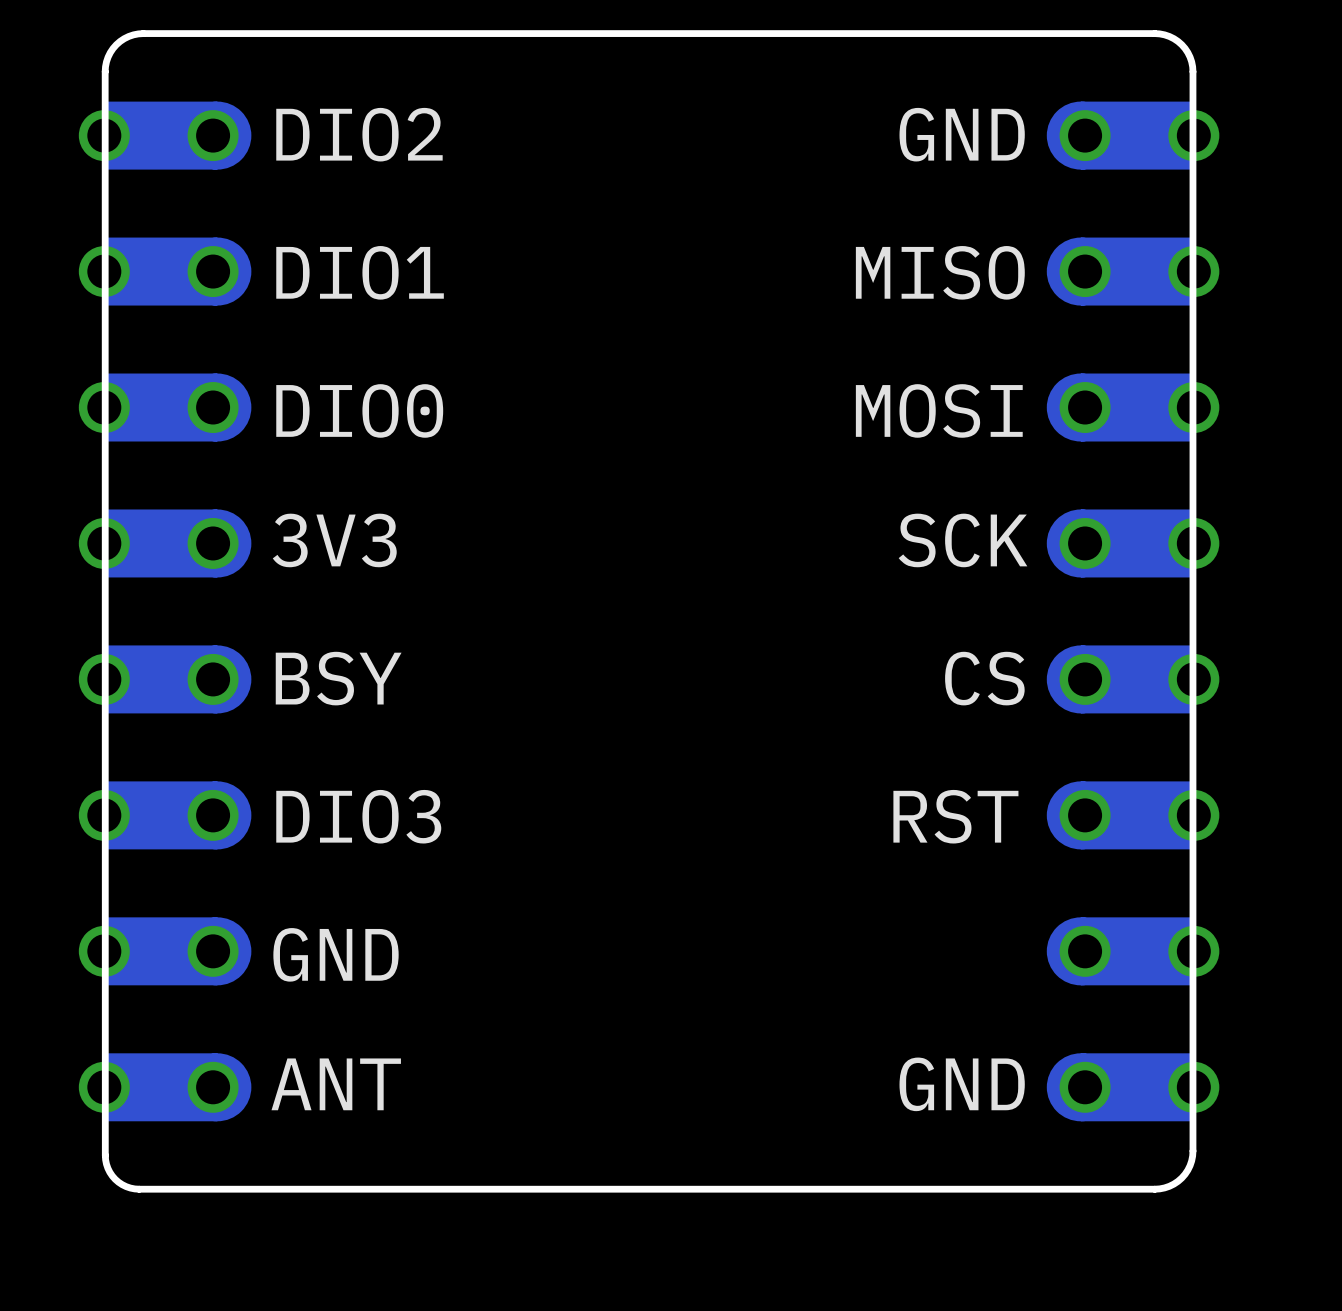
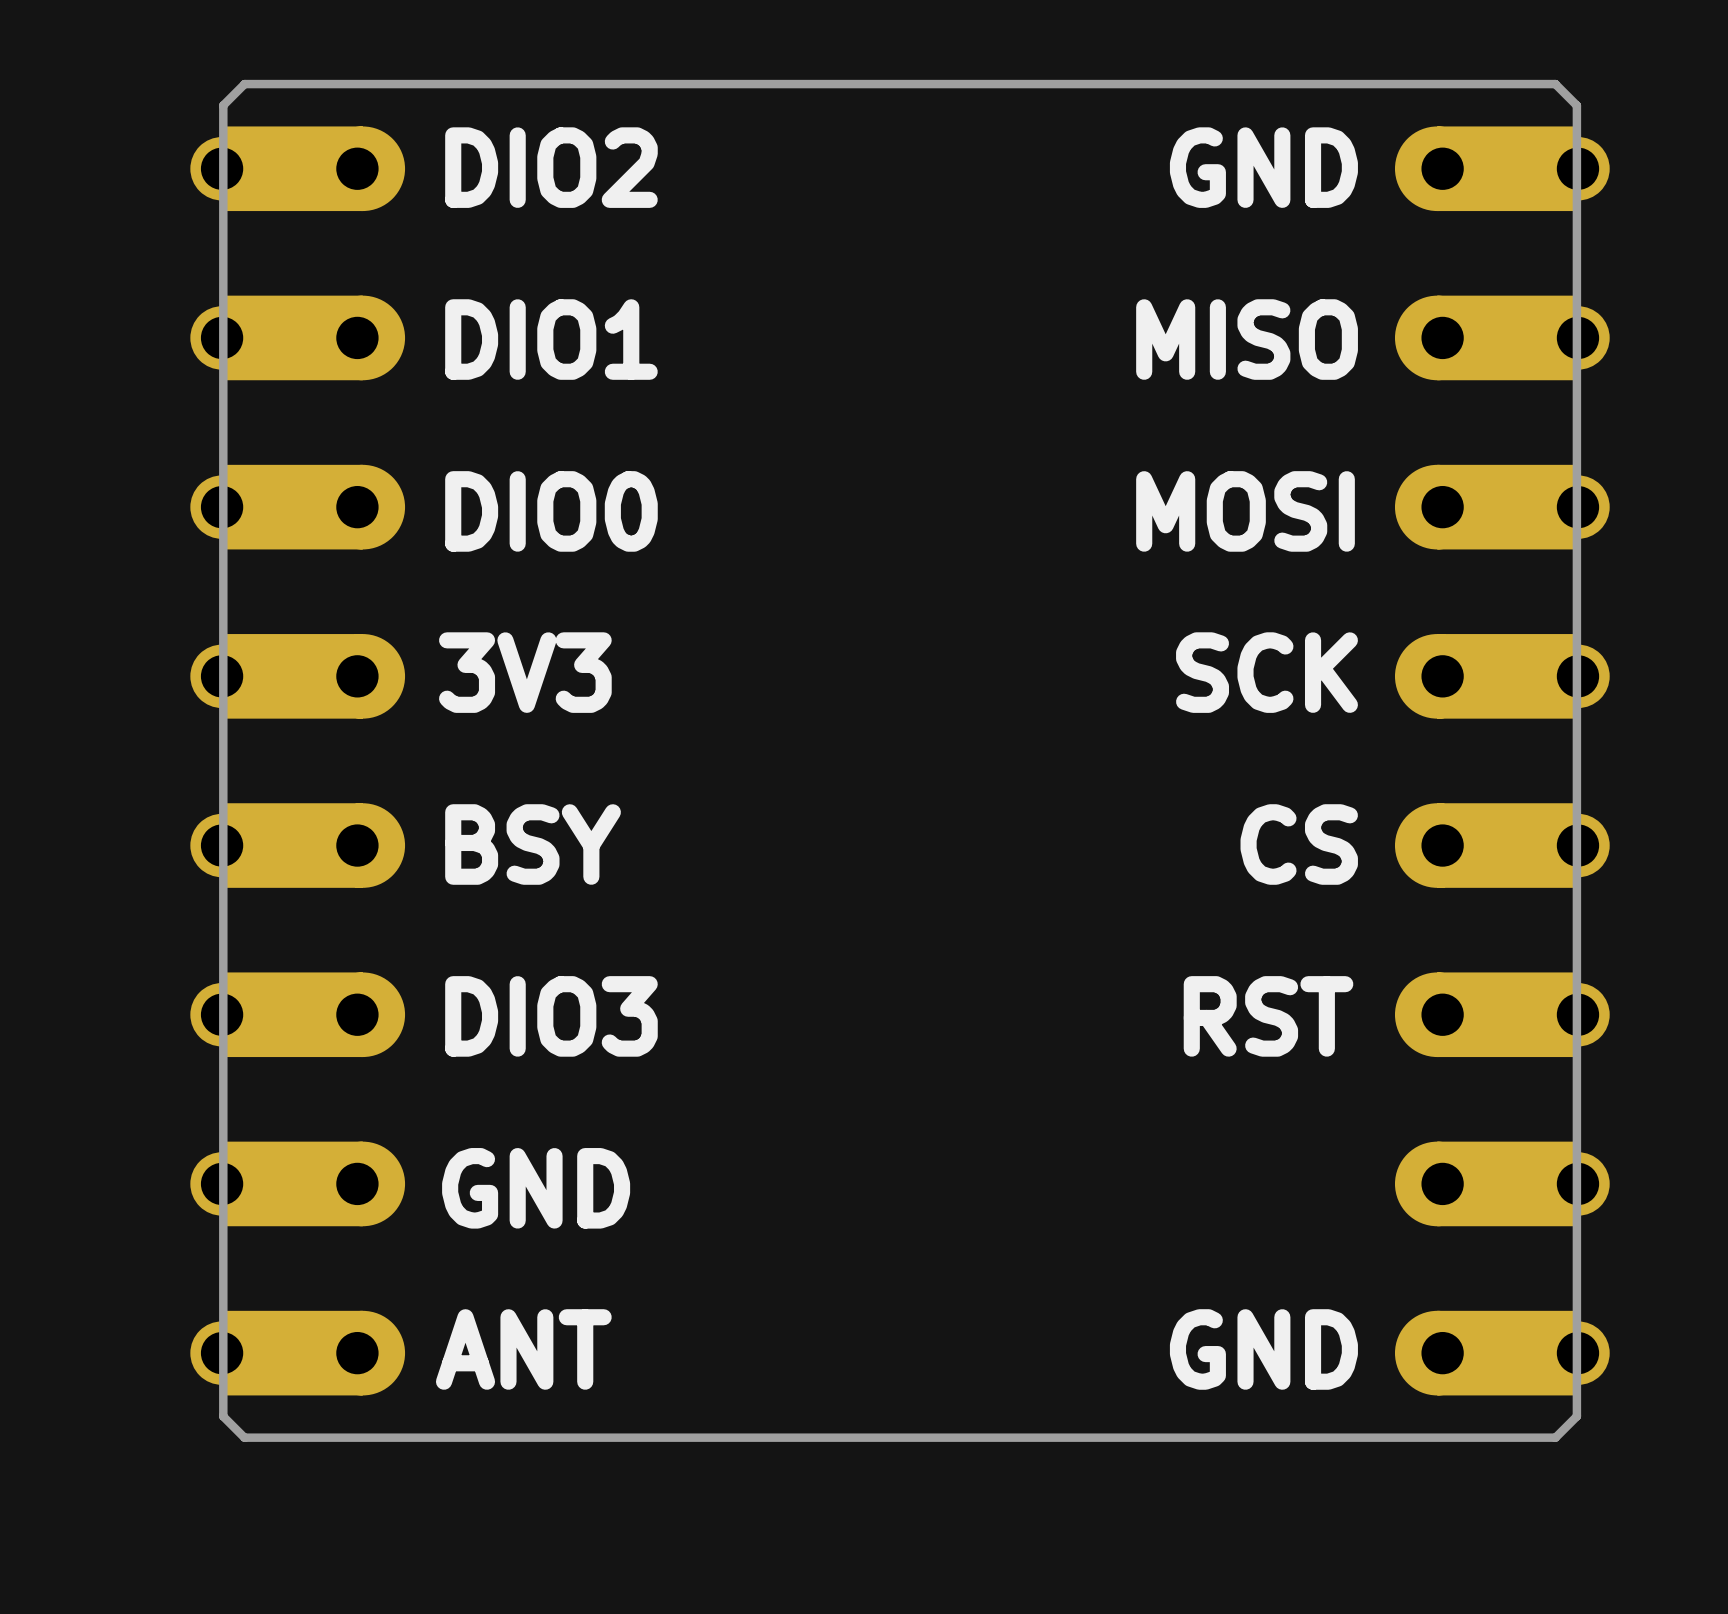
board edge: (1192, 84) (1191, 61) (1185, 48) (1173, 38) (1154, 33) (143, 33) (128, 36) (116, 44) (108, 57) (105, 71) (105, 1155) (107, 1168) (115, 1179) (126, 1186) (139, 1189) (1154, 1189) (1173, 1184) (1185, 1174) (1191, 1160) (1192, 1138) -> (1576, 105) (1555, 84) (244, 84) (223, 105) (223, 1416) (244, 1437) (1555, 1437) (1576, 1416)

